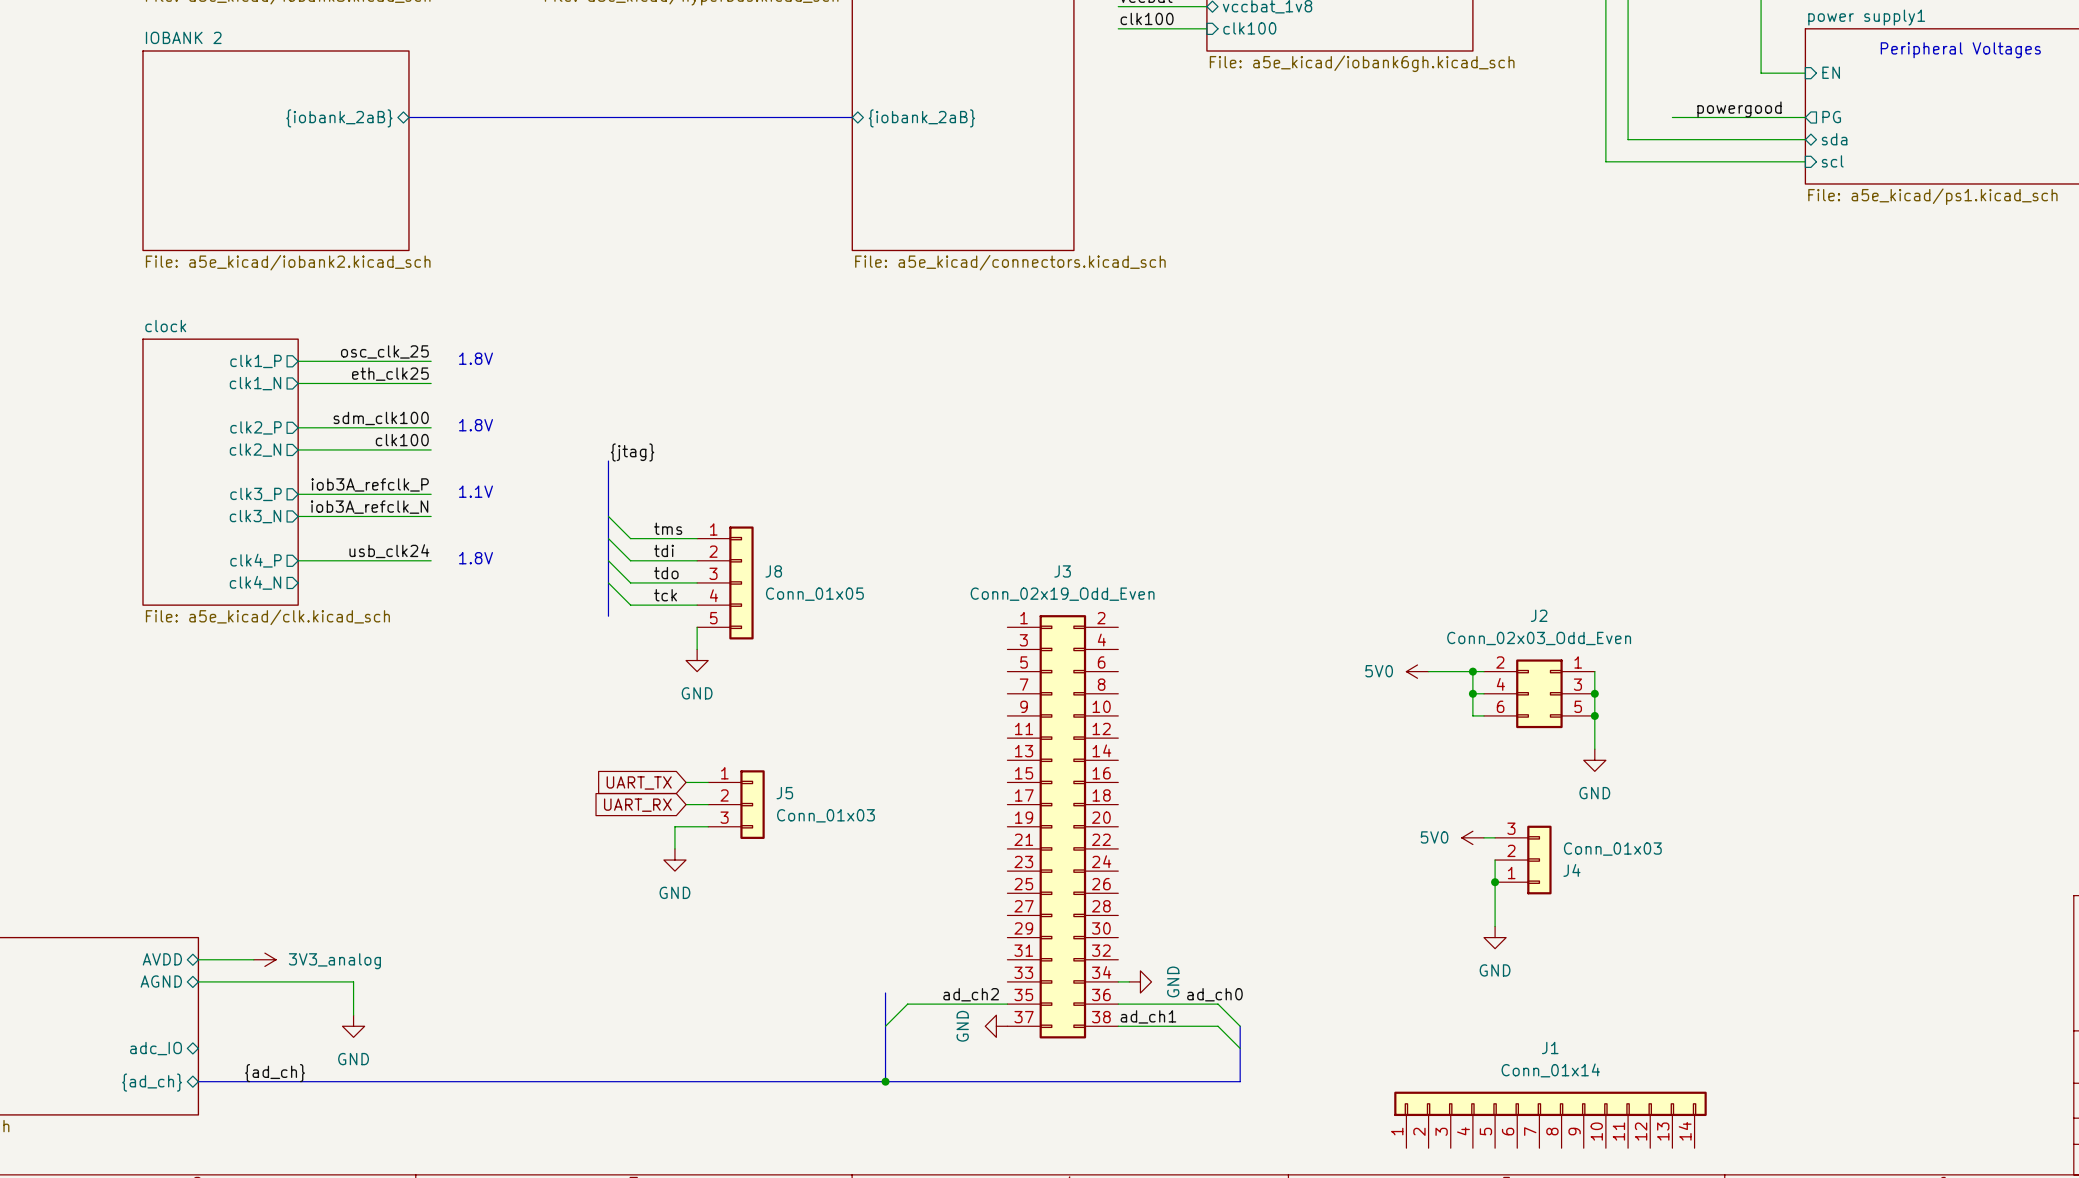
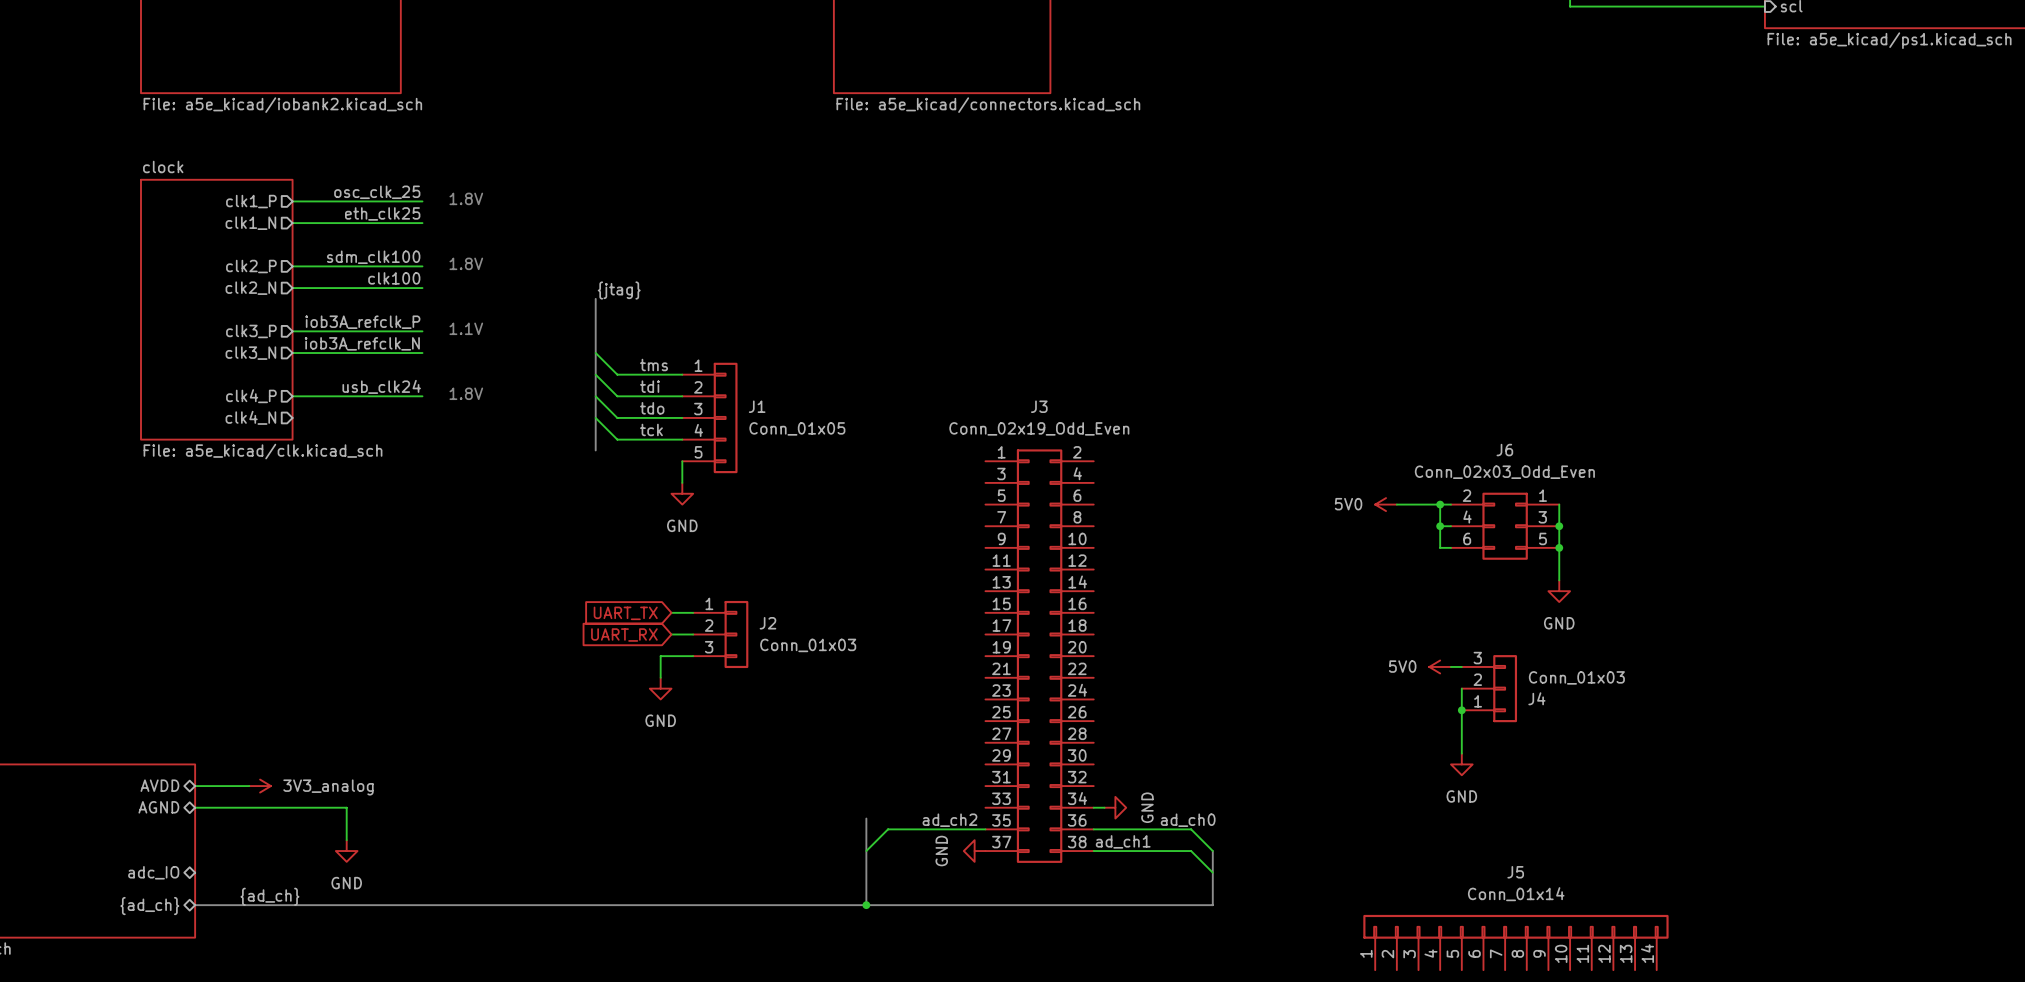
J8 name: J8 (773, 571) -> J1 (757, 406)
J2 name: J2 (1539, 615) -> J6 (1504, 450)
J5 name: J5 (784, 793) -> J2 (767, 623)
J1 name: J1 (1550, 1048) -> J5 (1515, 872)

